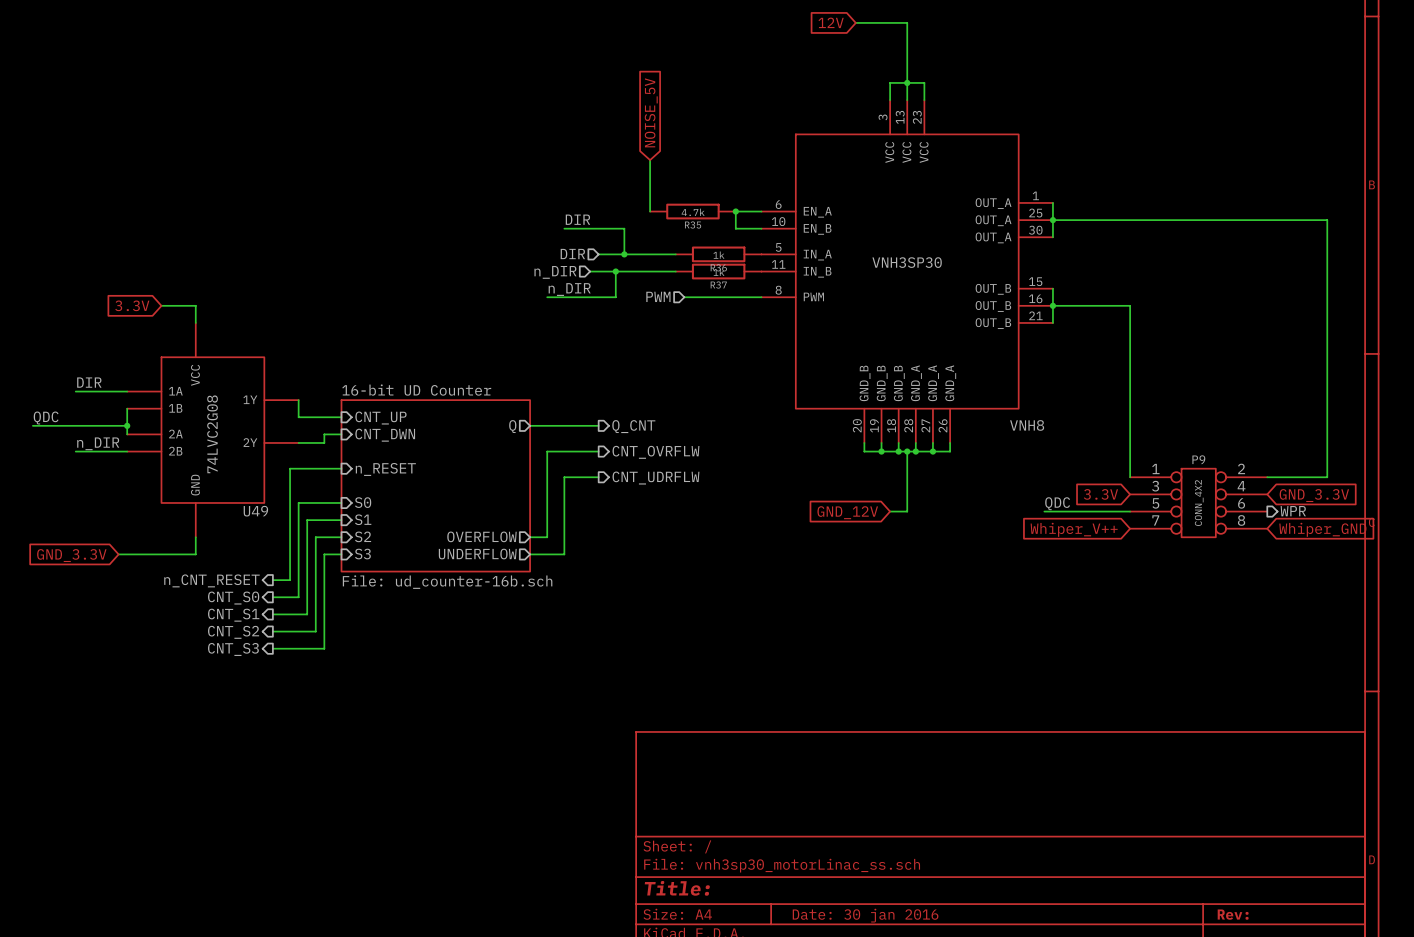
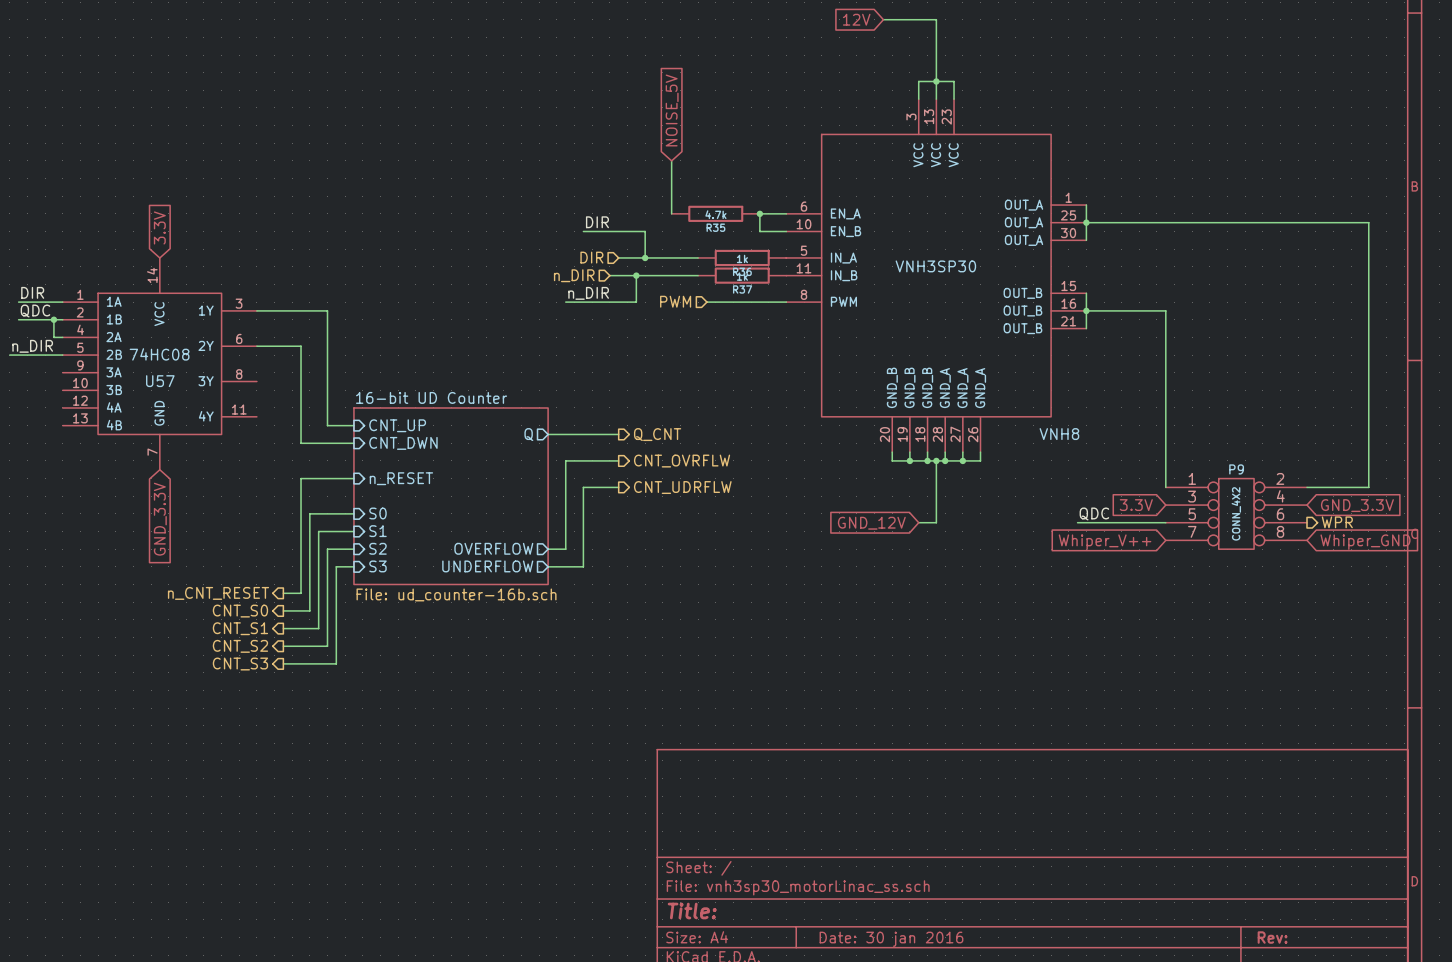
wire: none -> (18, 302) (62, 302)
global label rotation: 0° (132, 305) -> 90° clockwise (159, 227)
global label position: 3.3V (132, 305) -> 3.3V (159, 227)
wire: (161, 305) (195, 305) (195, 322) -> none
wire: none -> (18, 319) (62, 319)
wire: none -> (53, 319) (53, 337) (62, 337)
junction: none -> (53, 319)
U57: none -> 74HC08 (159, 363)
label position: DIR (89, 382) -> DIR (32, 292)
wire: (75, 391) (127, 391) -> (9, 355) (62, 355)
wire: (298, 400) (298, 417) (315, 417) -> (256, 310) (327, 310) (327, 425)
wire: (127, 408) (127, 434) -> none
label position: QDC (46, 417) -> QDC (35, 311)
wire: (32, 425) (127, 425) -> none
junction: (127, 425) -> none
U49: 74LVC2G08 (212, 430) -> none
wire: (324, 434) (324, 442) (298, 442) -> (336, 443) (301, 443) (301, 346) (256, 346)
label position: n_DIR (98, 443) -> n_DIR (32, 346)
wire: (75, 451) (127, 451) -> none
wire: (195, 537) (195, 554) (118, 554) -> none
global label rotation: 0° (71, 555) -> 90° counterclockwise (160, 519)

